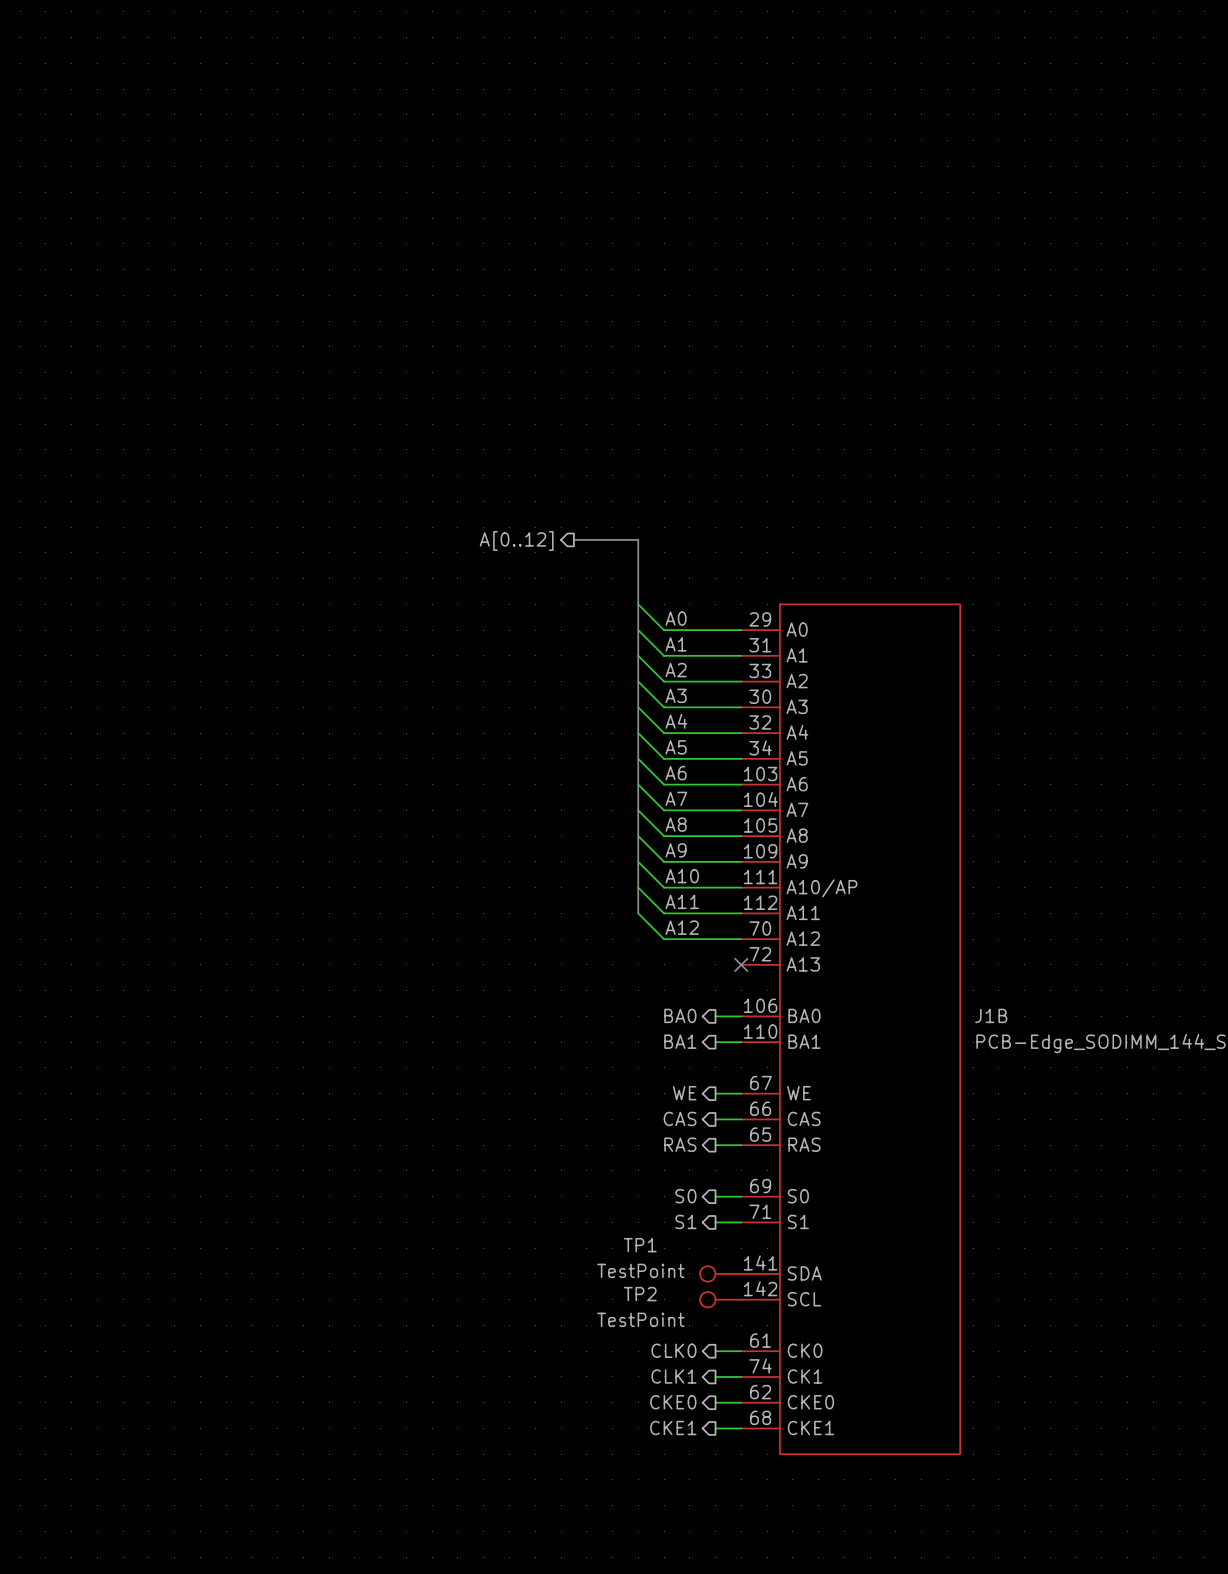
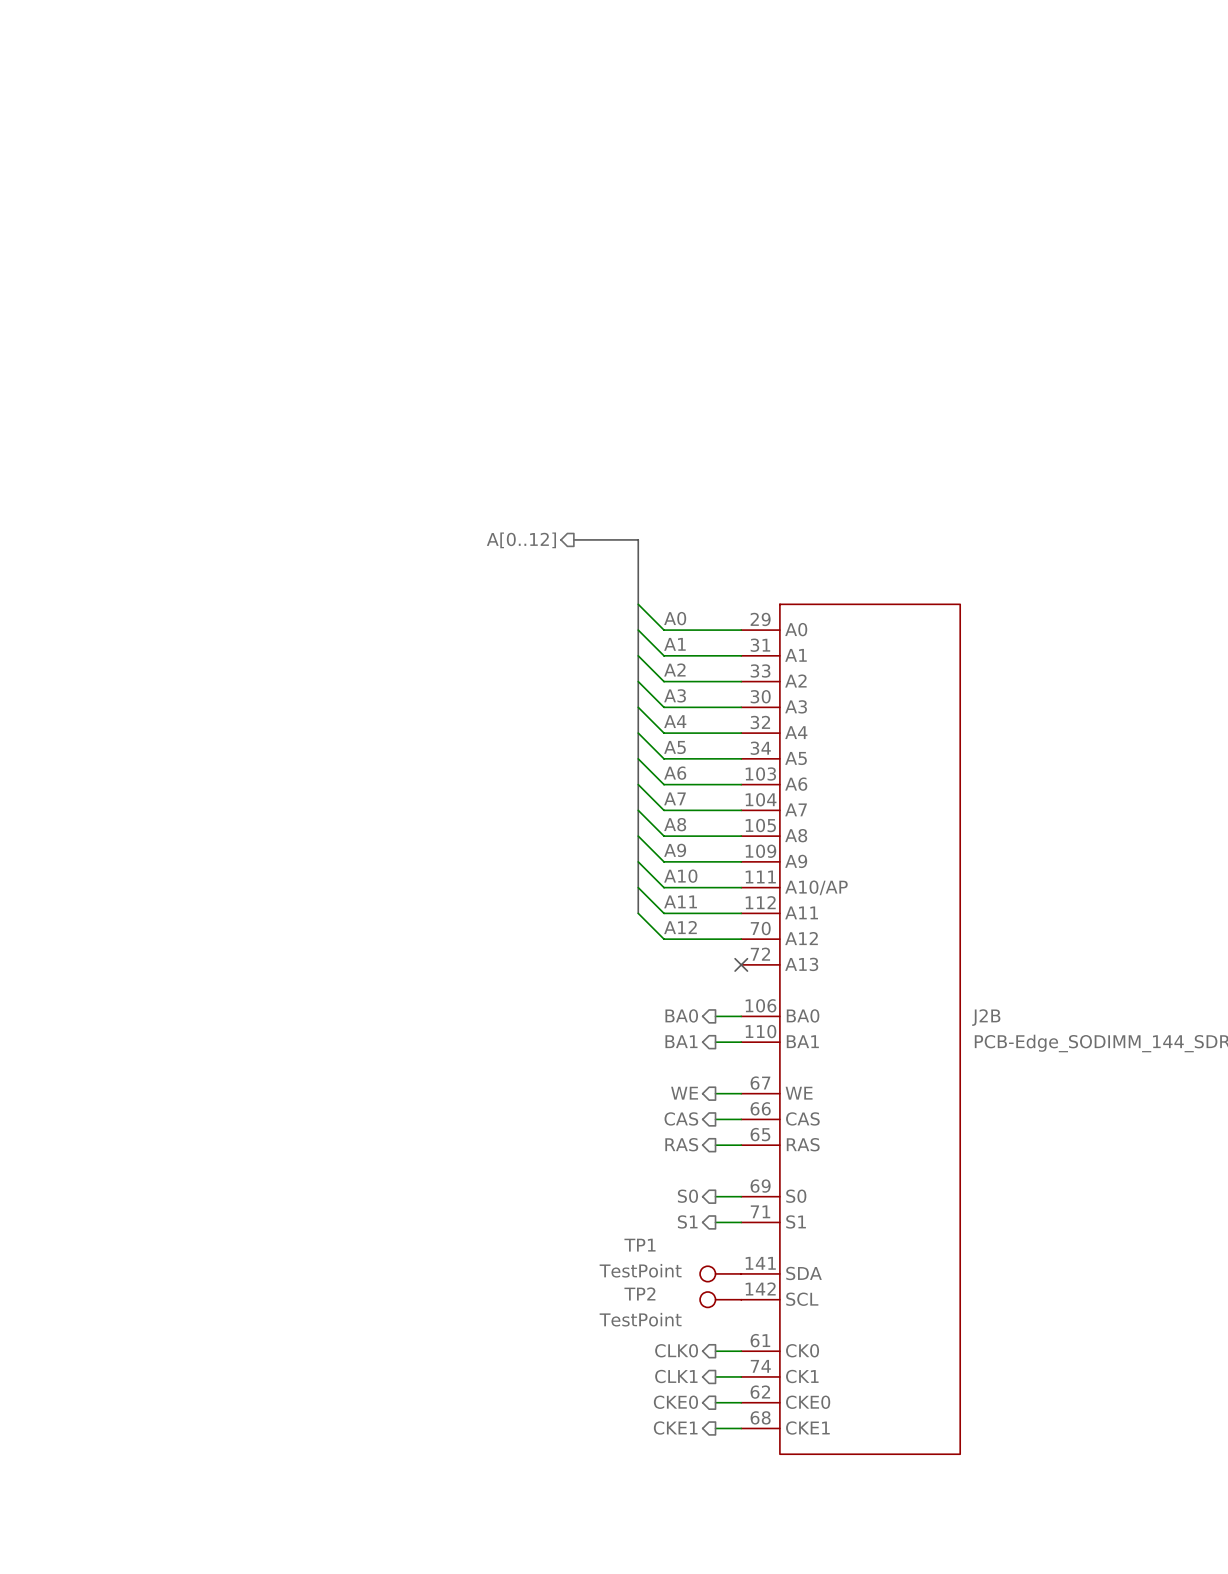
J1B name: J1B (991, 1015) -> J2B (986, 1017)

